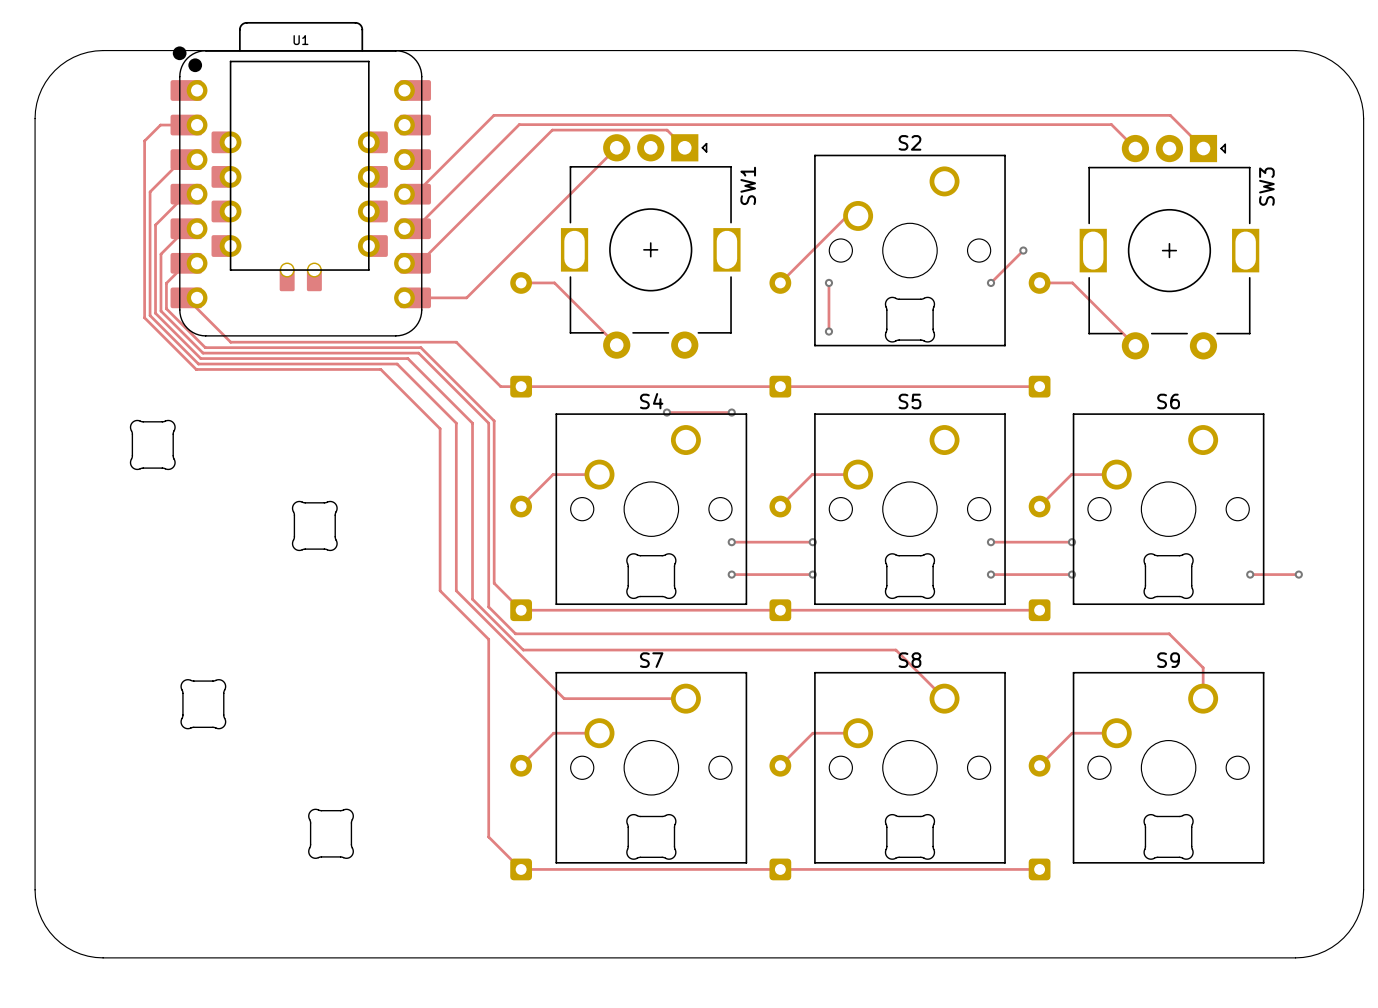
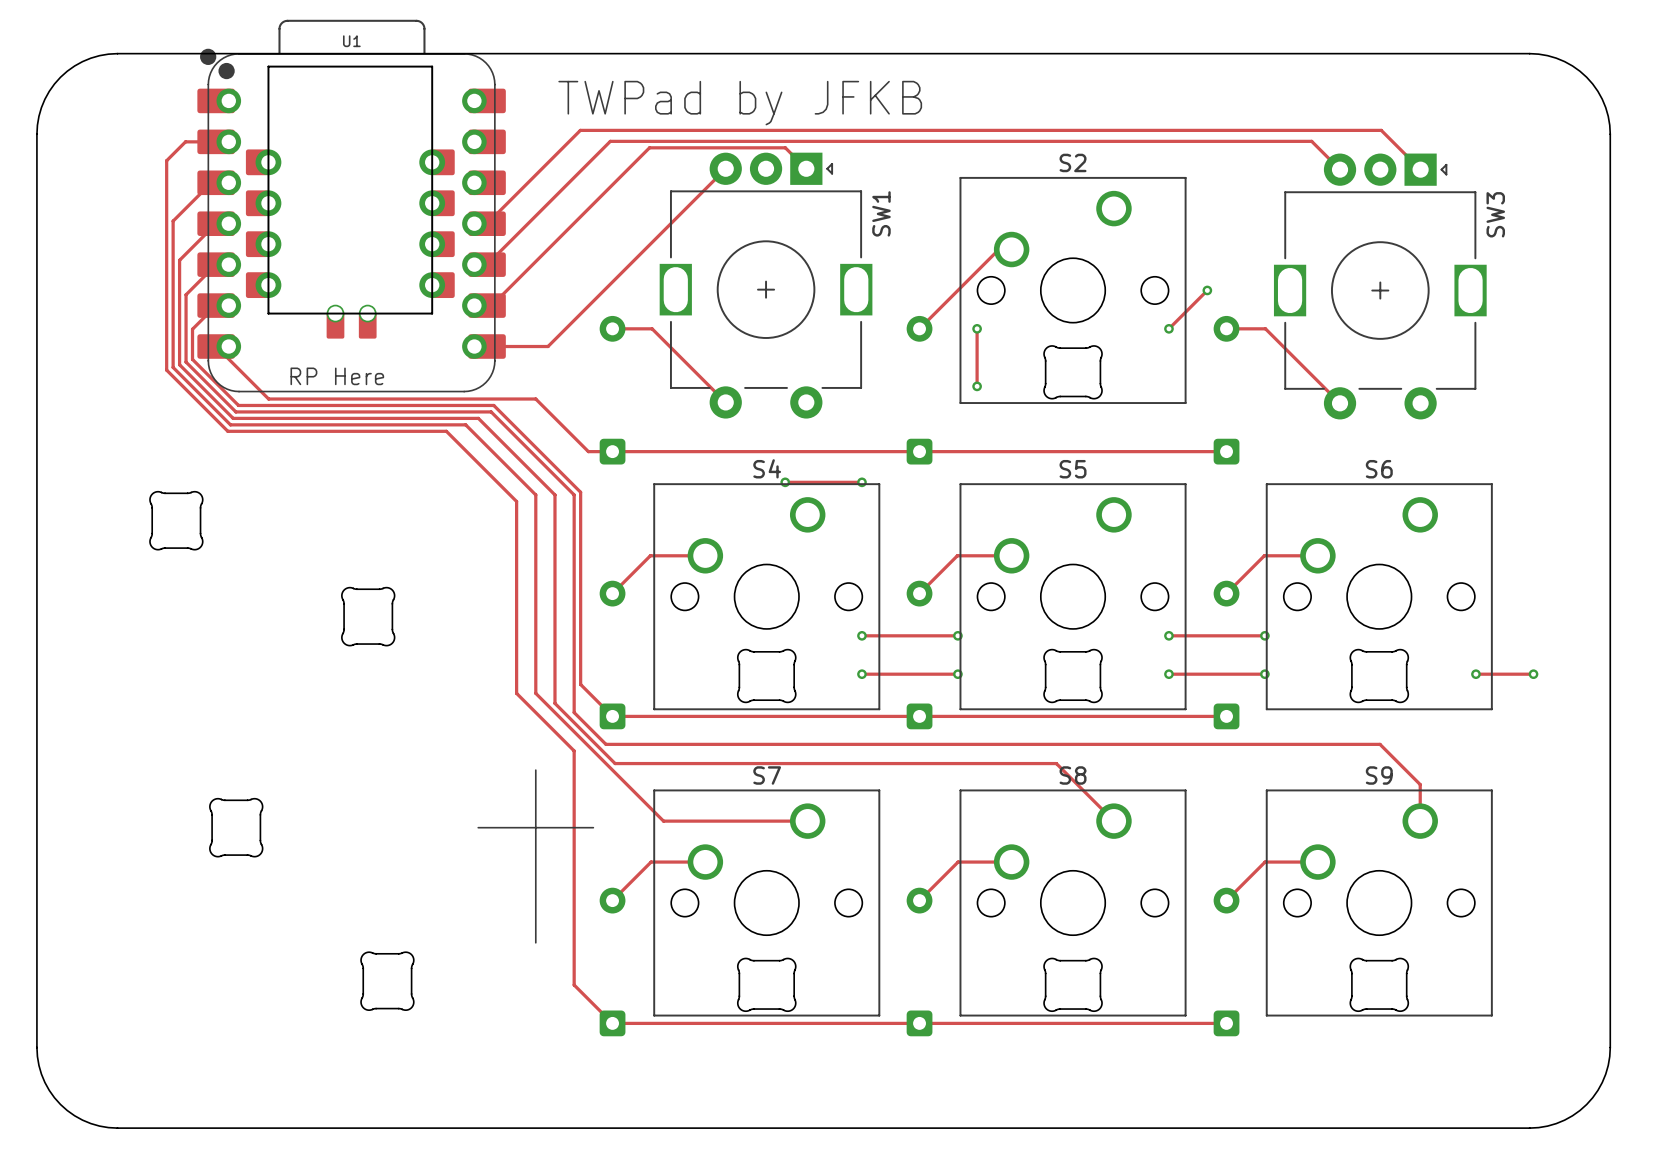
text: none -> TWPad by JFKB (740, 103)
text: none -> RP Here (337, 376)
line: none -> (535, 770) (535, 942)
line: none -> (478, 827) (593, 827)

